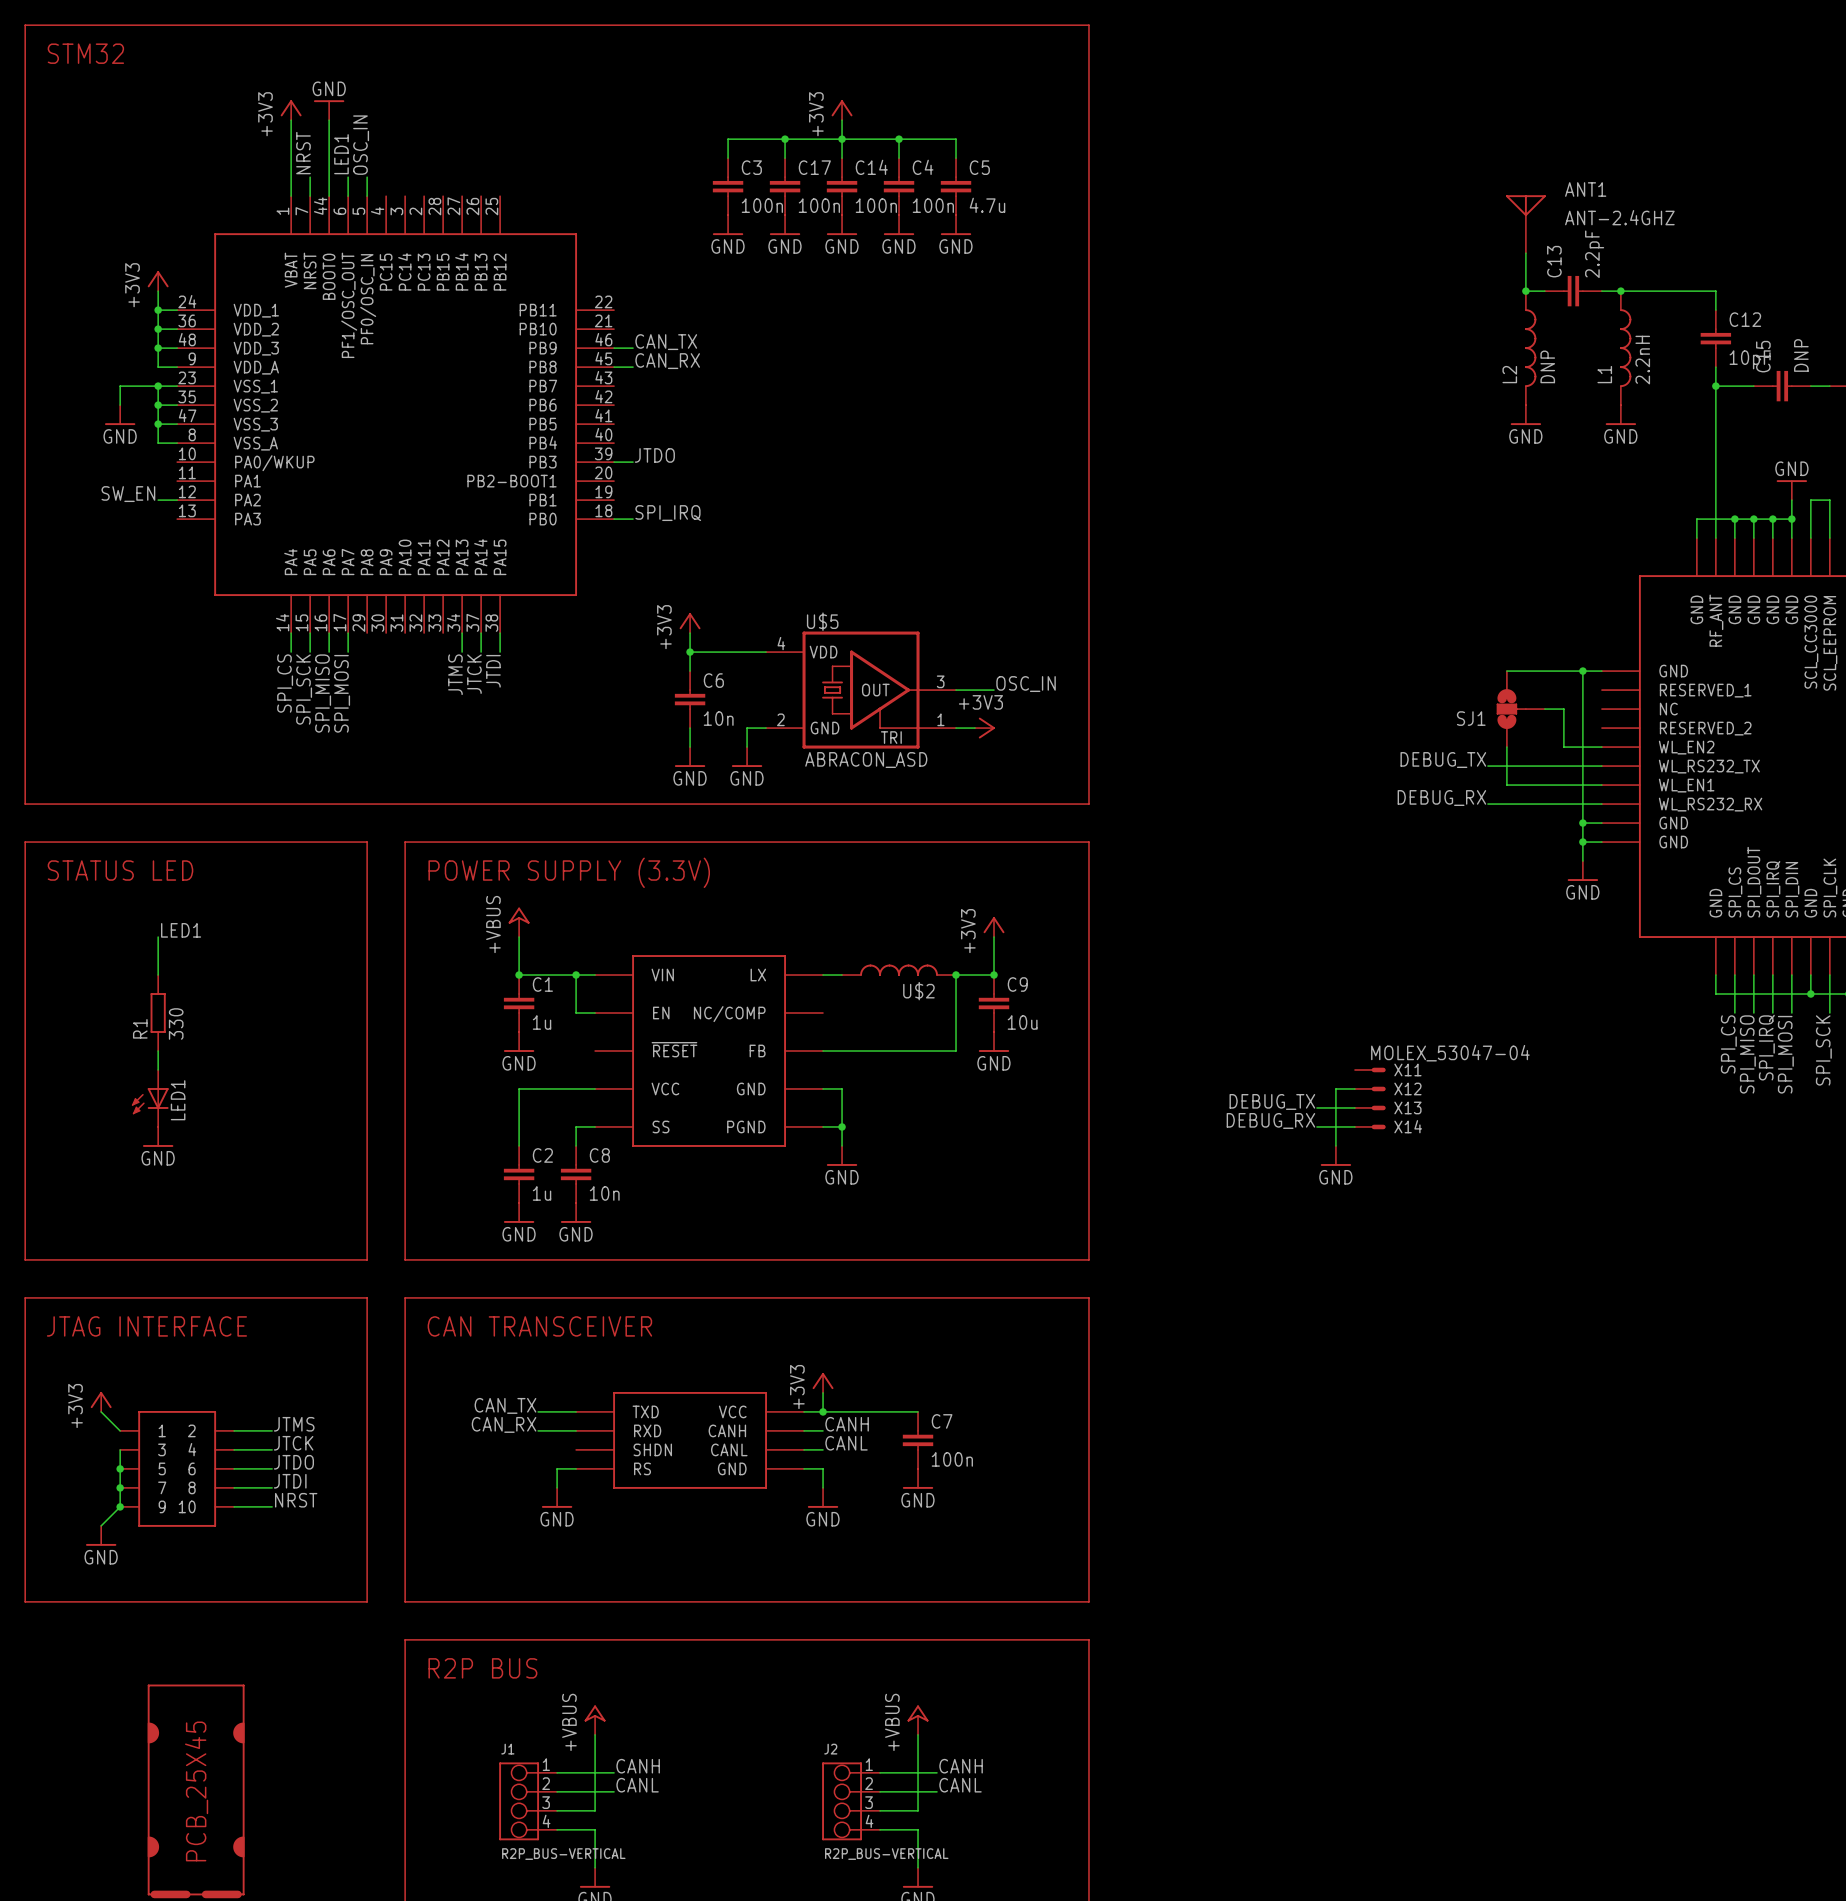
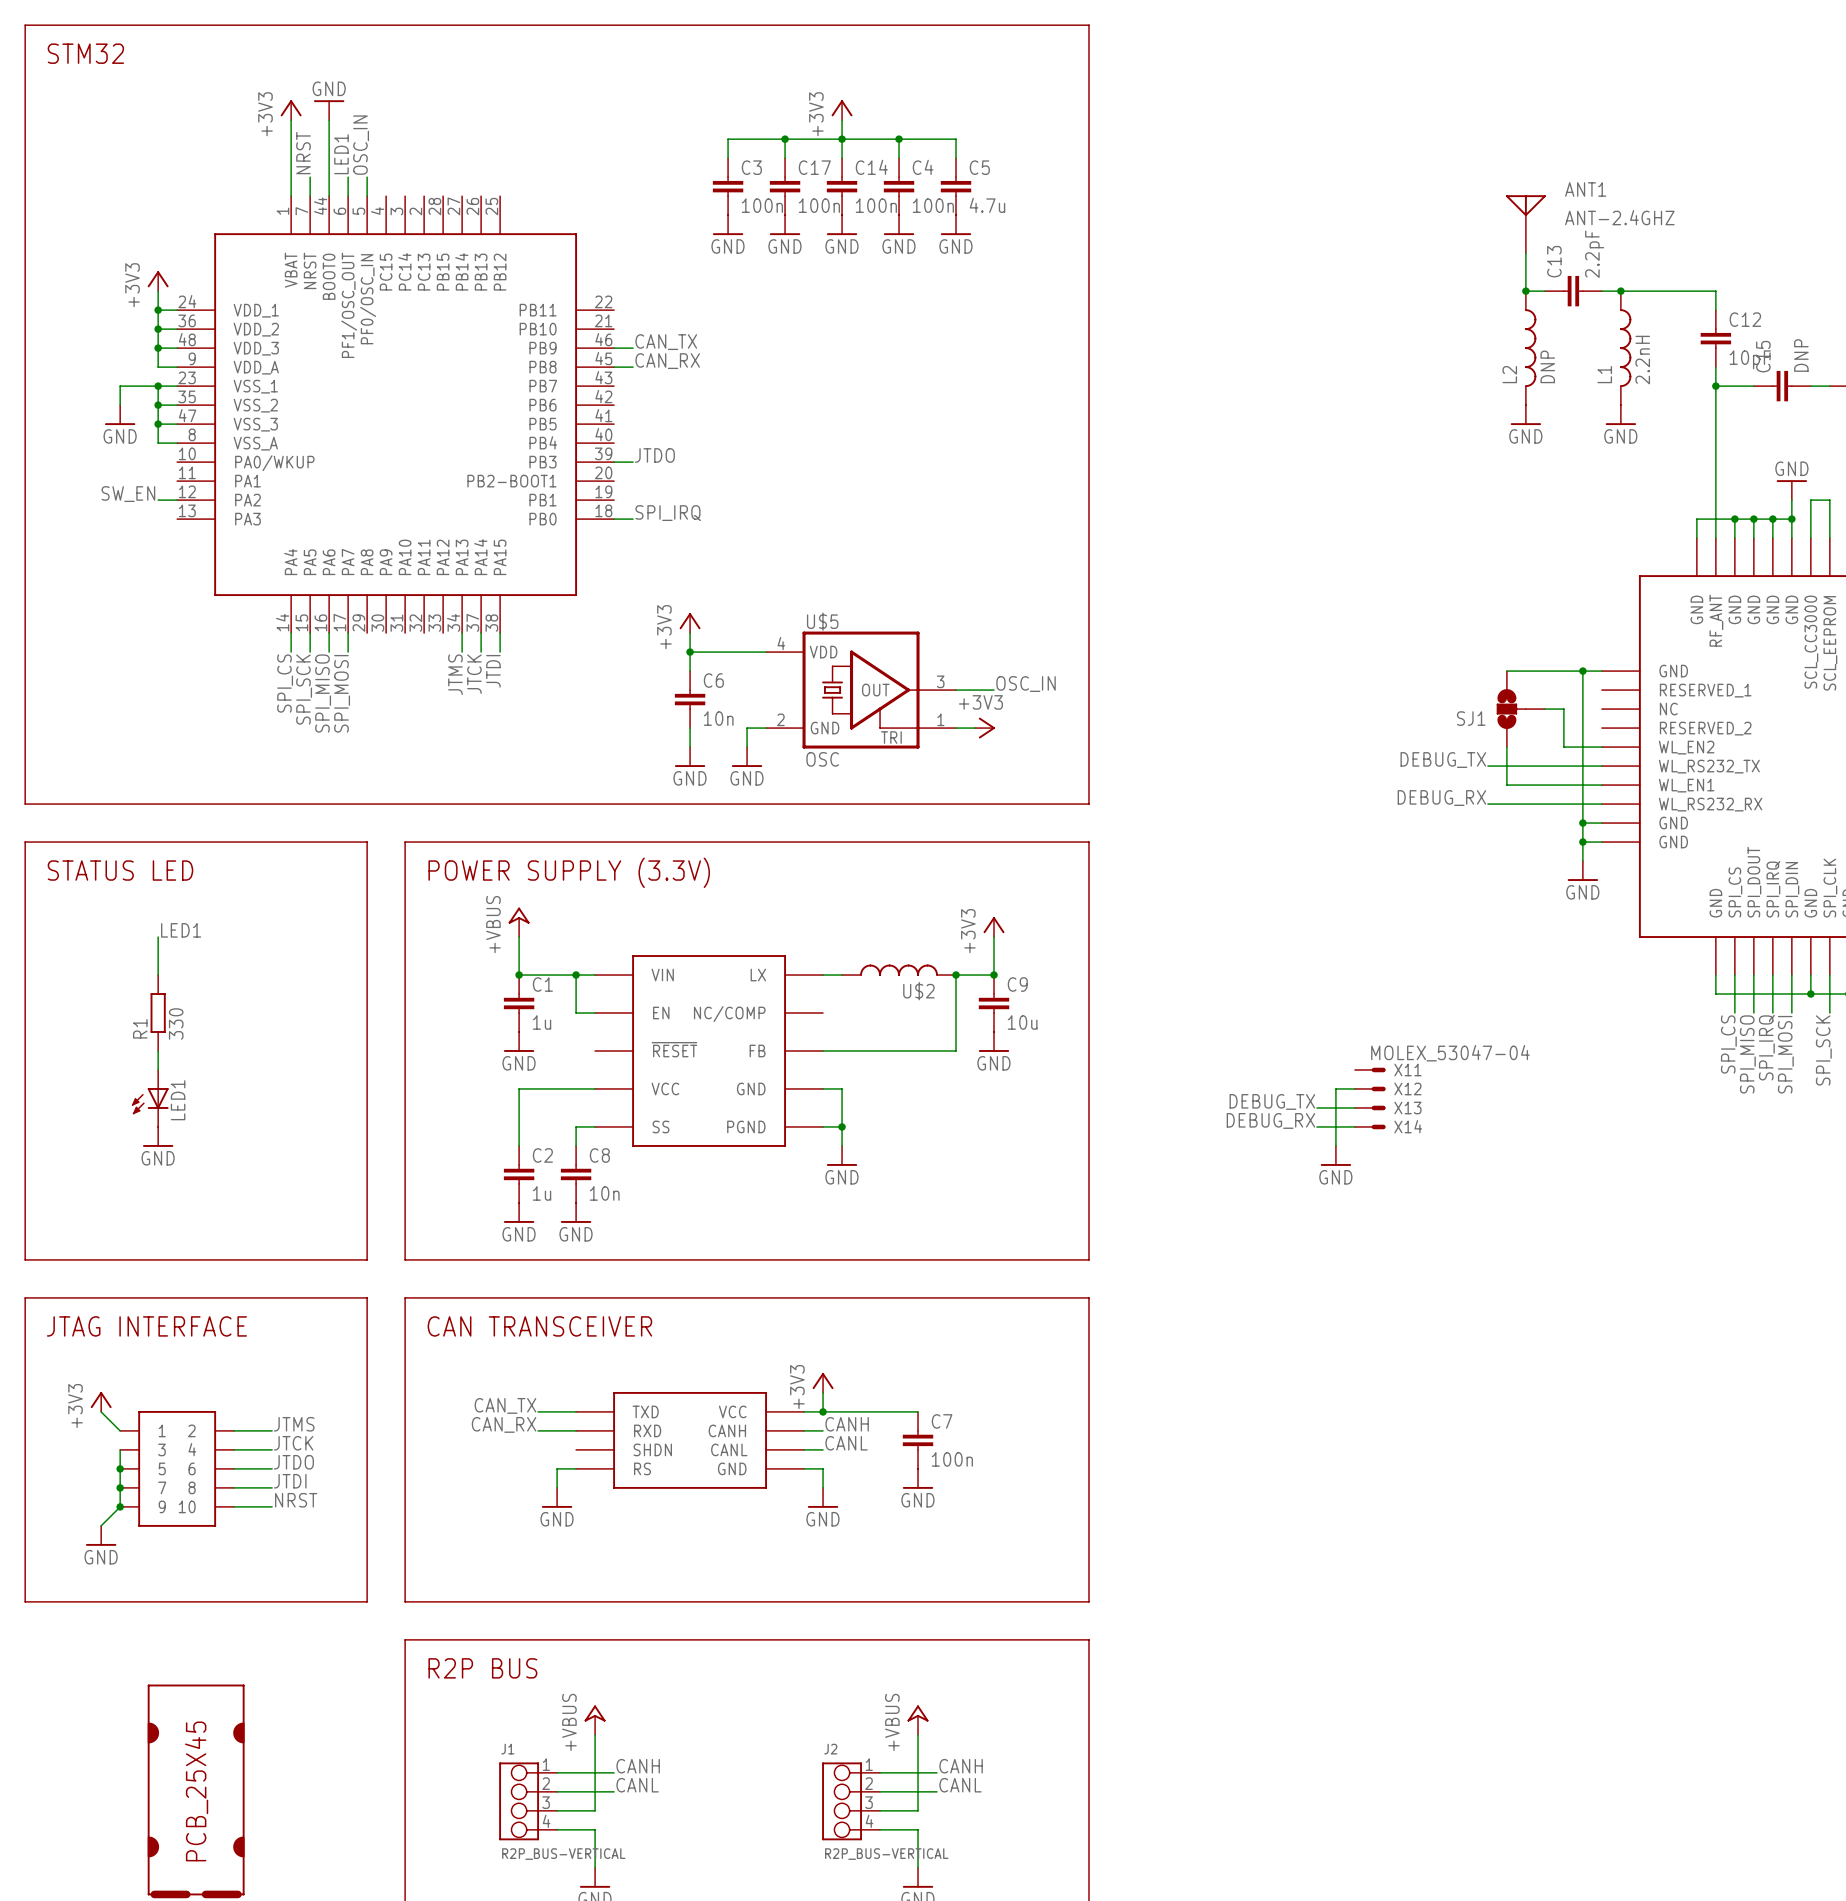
U$5 value: ABRACON_ASD (866, 760) -> OSC (822, 759)

